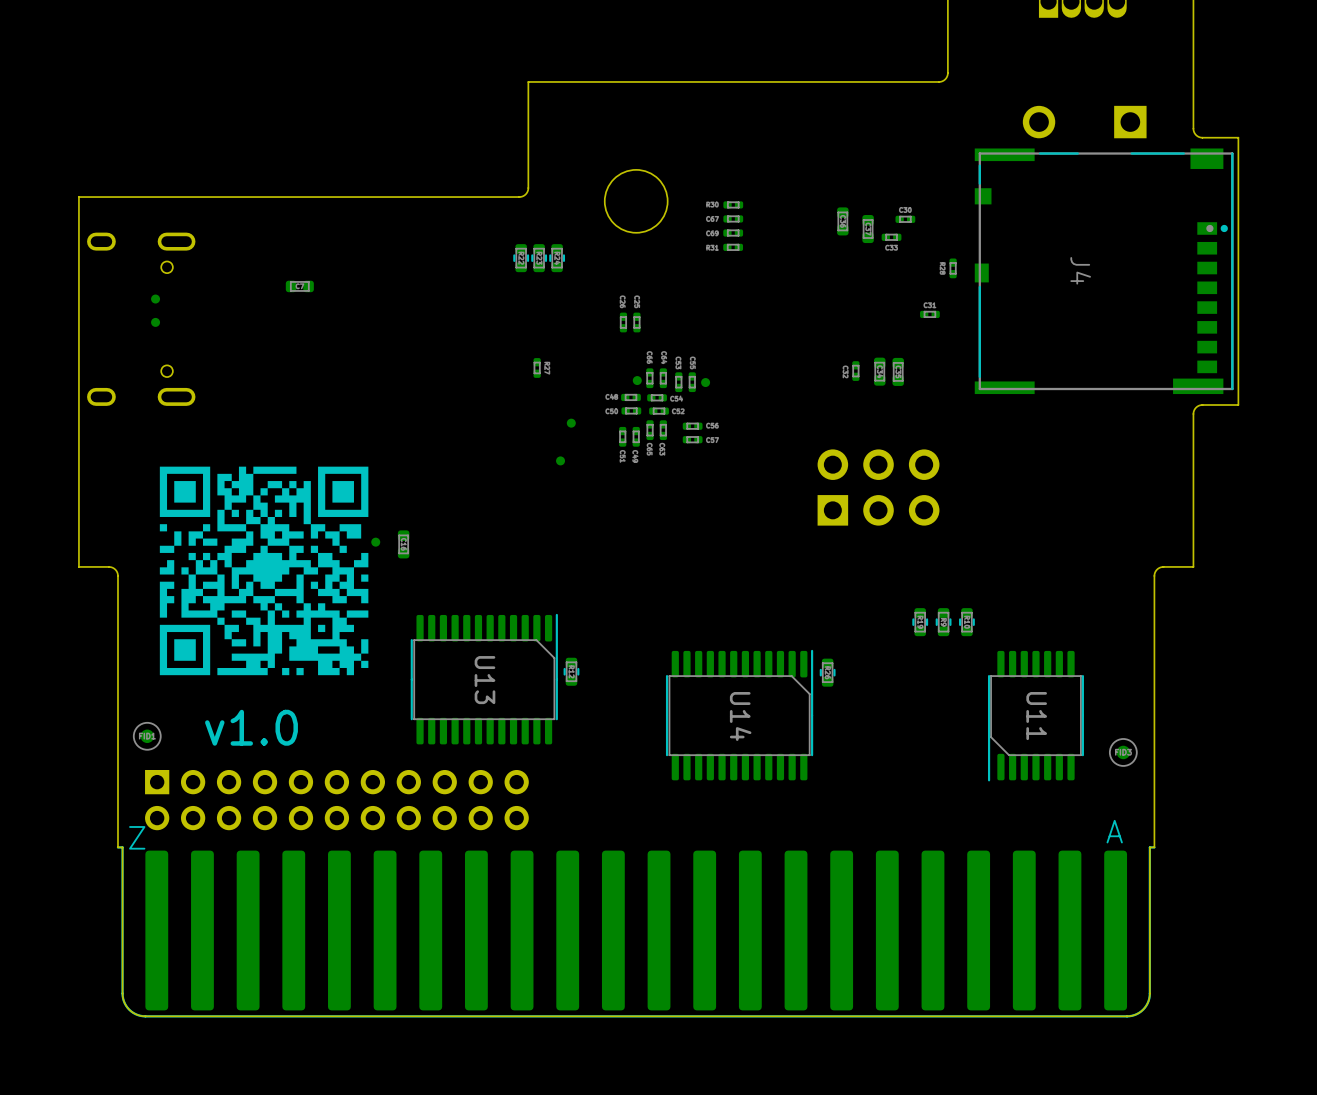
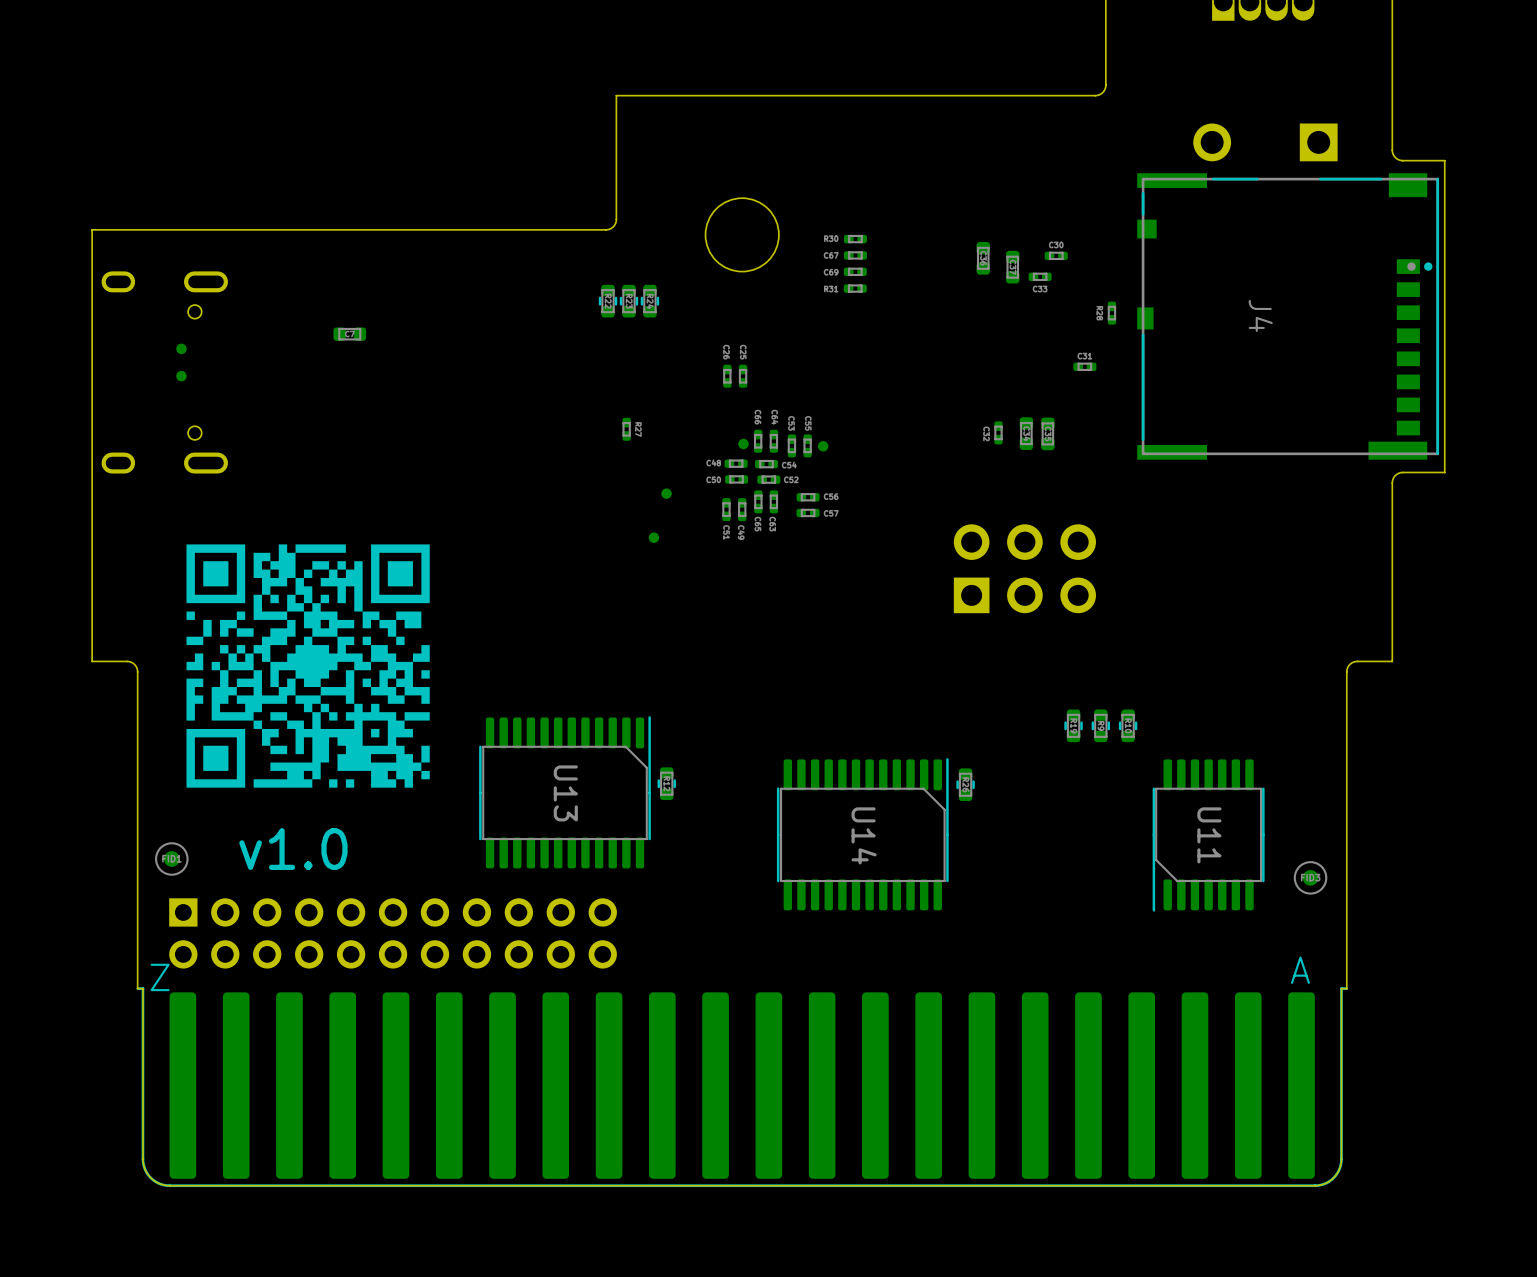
part: (375, 542) -> none
part: (403, 544) -> none

